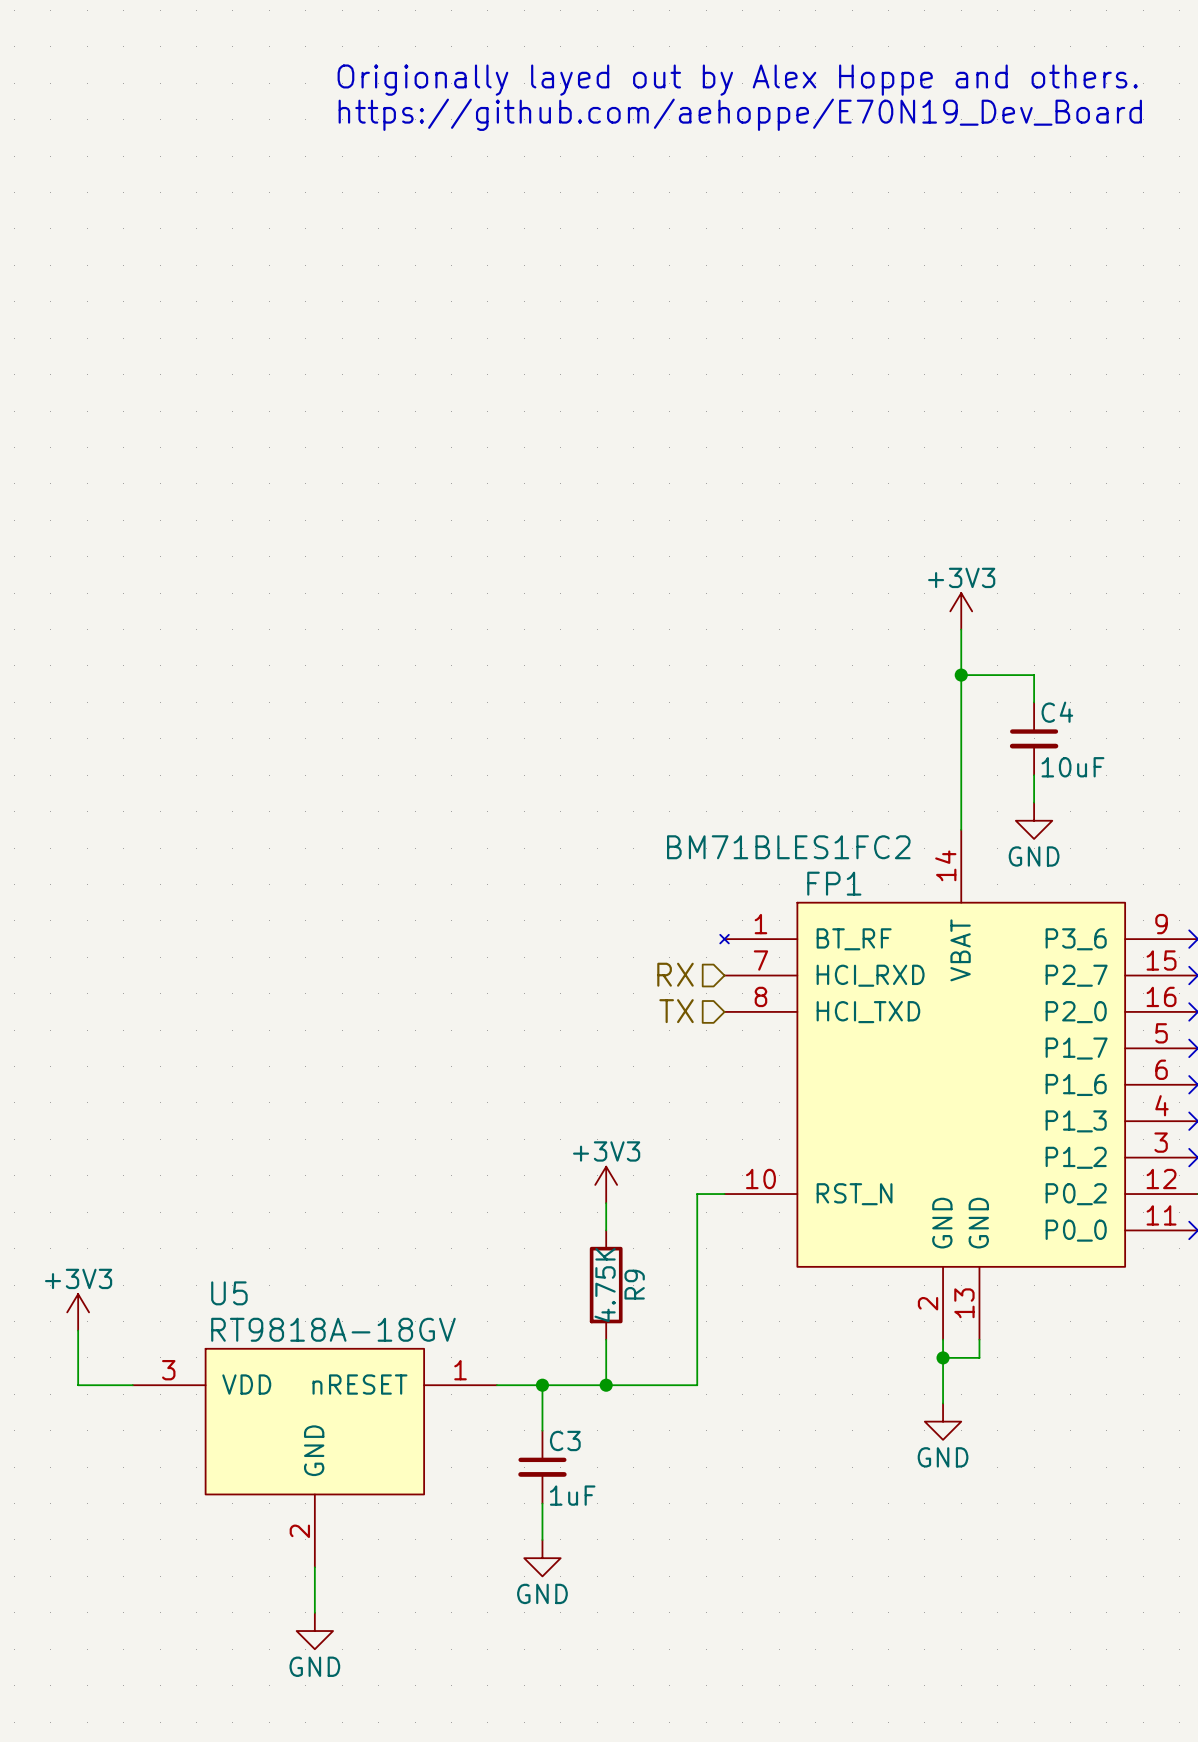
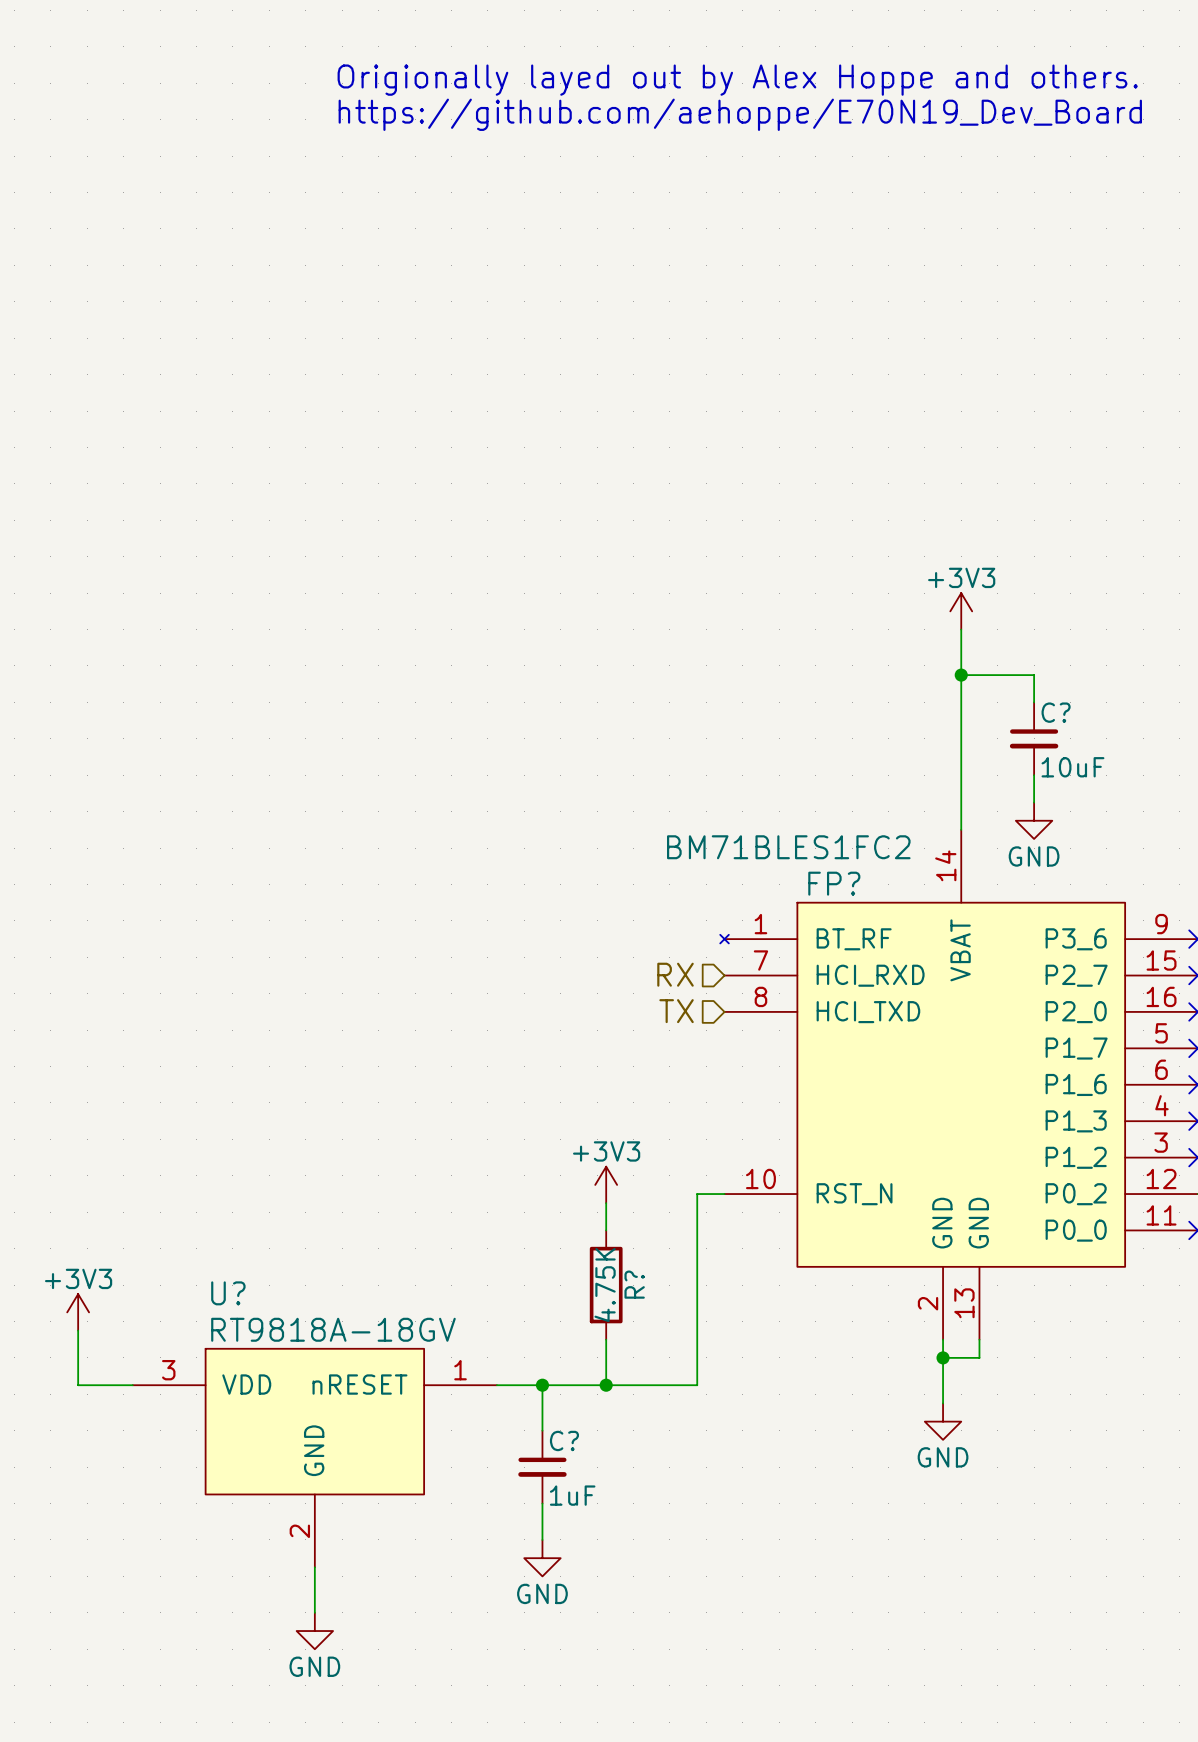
C4 name: C4 (1057, 712) -> C? (1056, 712)
FP1 name: FP1 (834, 883) -> FP? (834, 883)
R9 name: R9 (634, 1284) -> R? (634, 1284)
U5 name: U5 (229, 1293) -> U? (228, 1293)
C3 name: C3 (565, 1440) -> C? (564, 1440)

